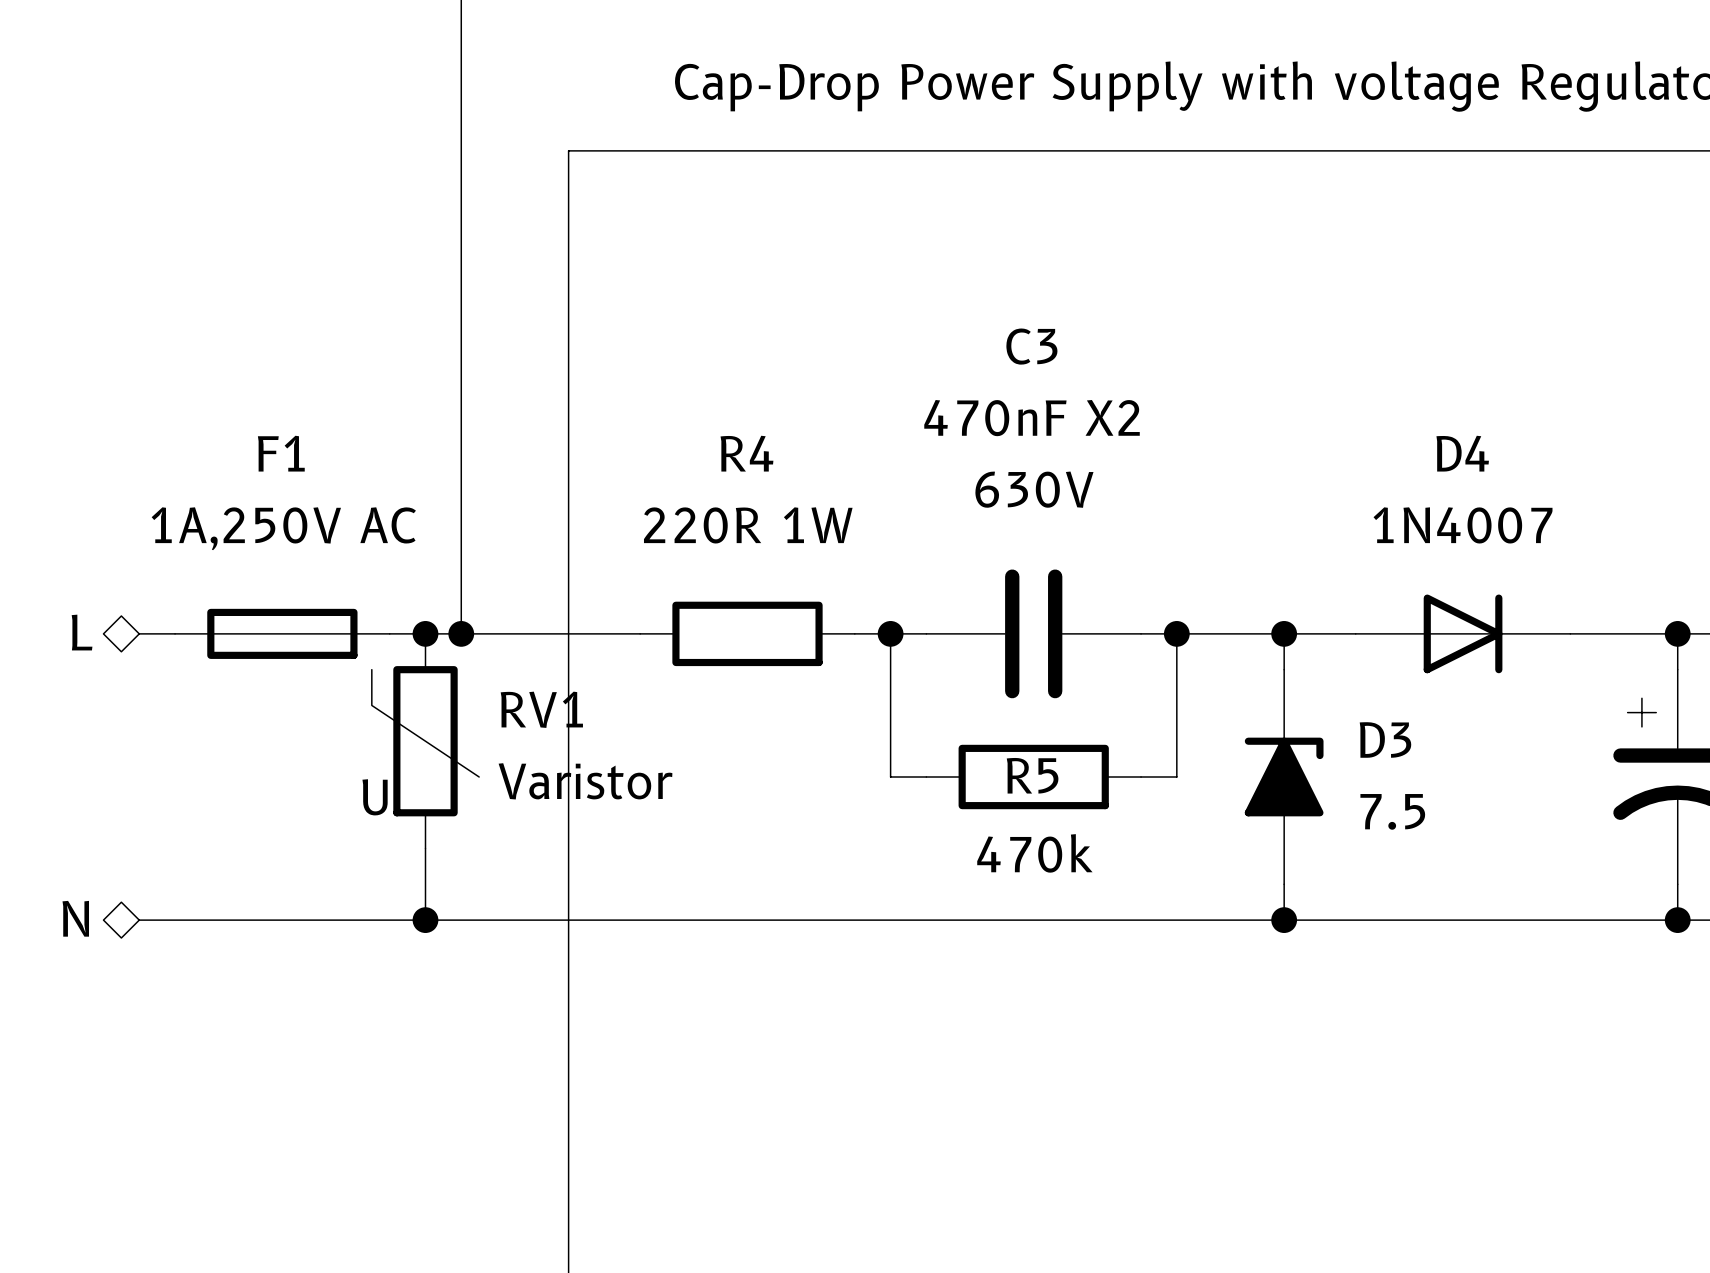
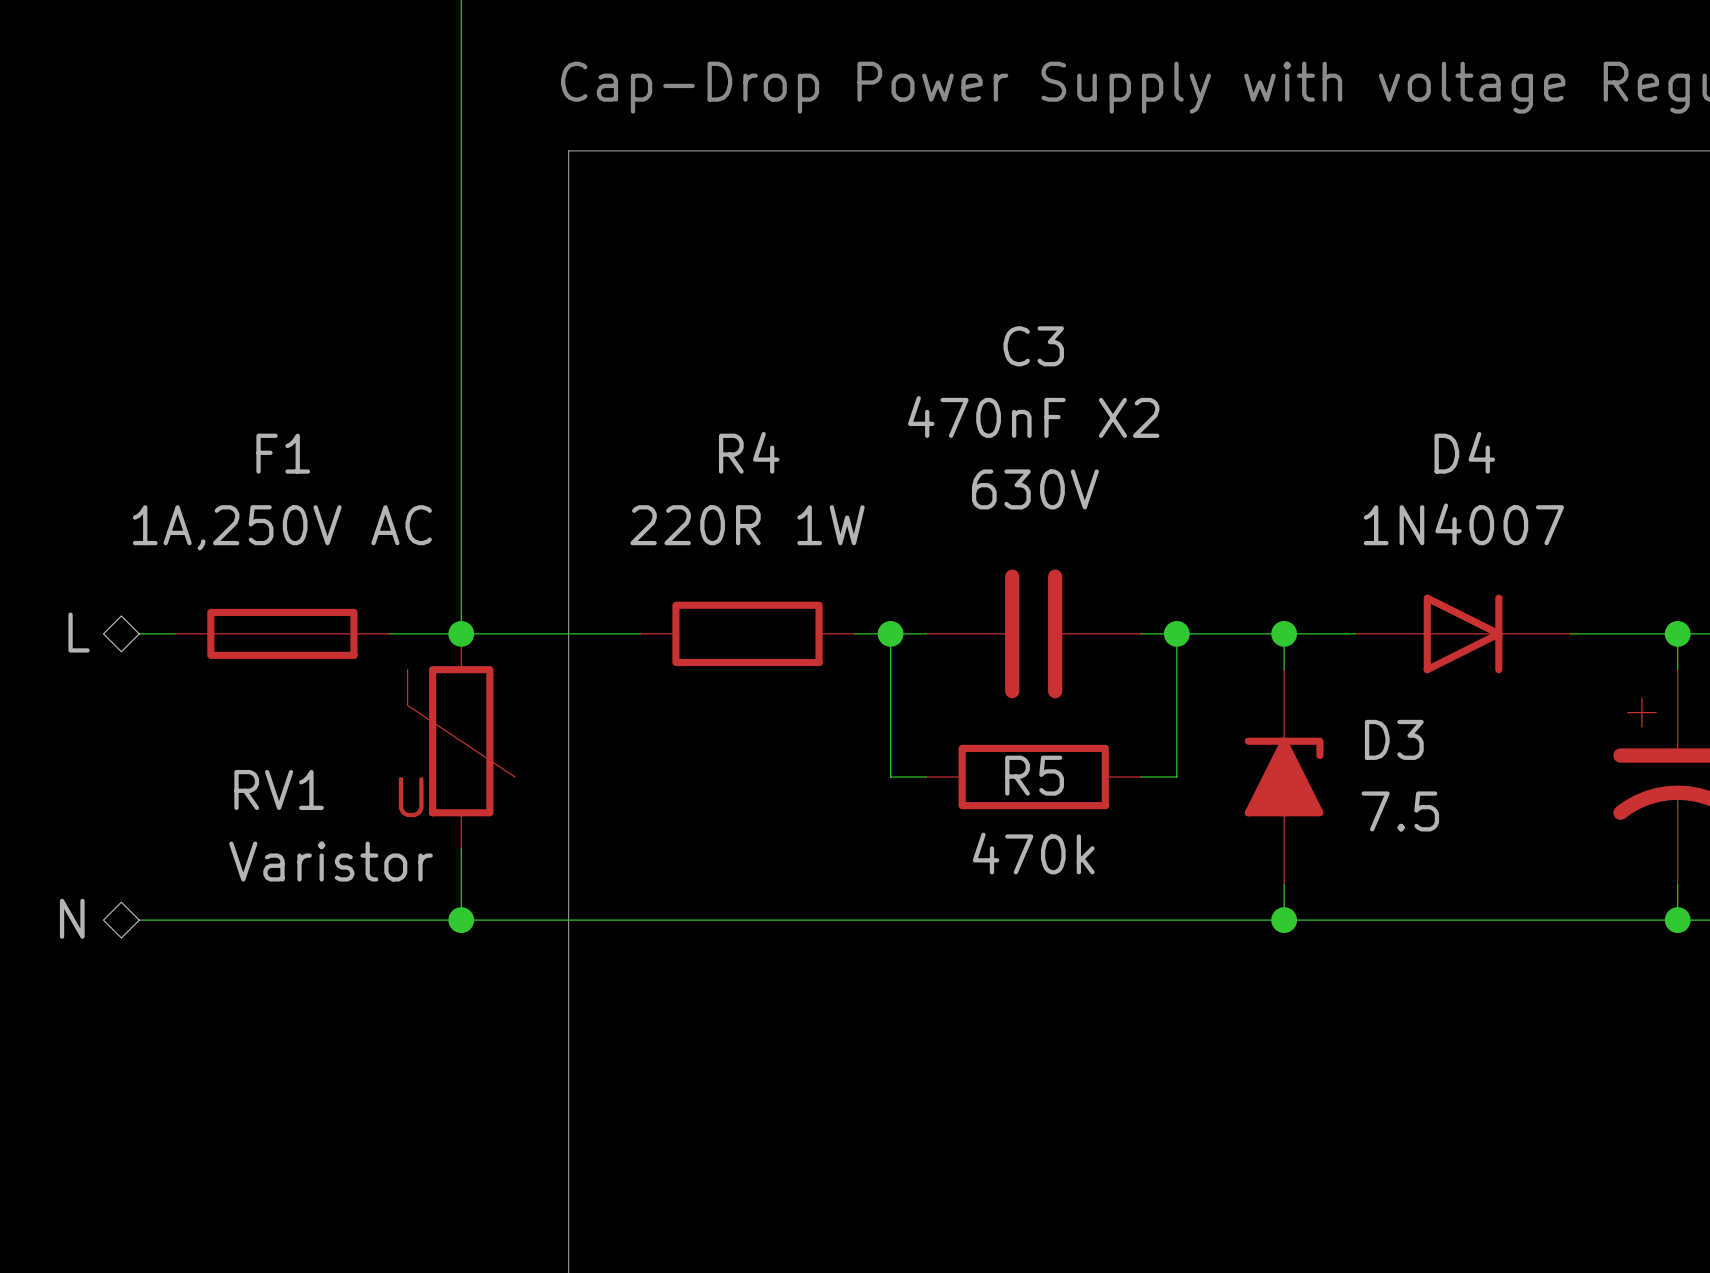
junction: (425, 633) -> none
RV1 name position: RV1 (541, 709) -> RV1 (279, 789)
RV1 position: (425, 741) -> (461, 741)
RV1 value position: Varistor (585, 781) -> Varistor (331, 861)
wire: (425, 848) (425, 920) -> (461, 848) (461, 920)
junction position: (425, 920) -> (461, 920)

